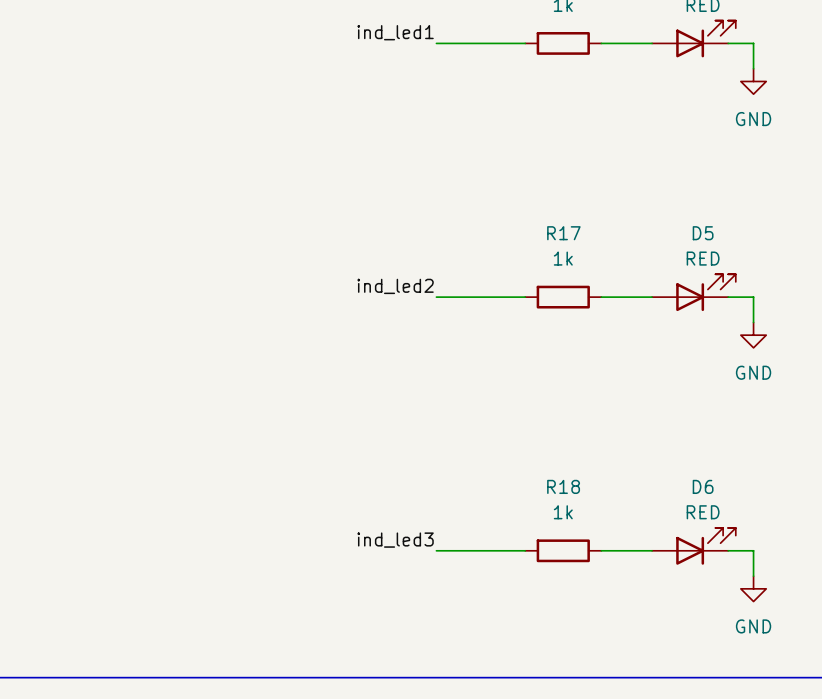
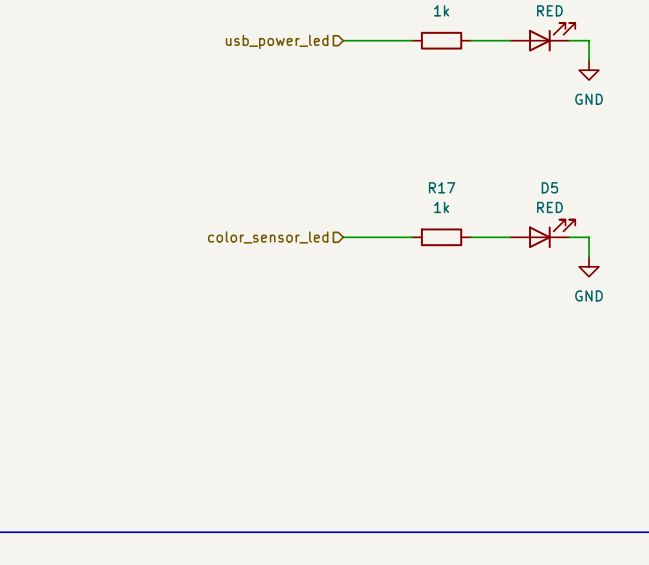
label: ind_led1 (395, 32) -> none
hierarchical label: none -> usb_power_led (277, 41)
label: ind_led2 (395, 286) -> none
hierarchical label: none -> color_sensor_led (268, 237)
label: ind_led3 (395, 540) -> none
D6: RED (693, 546) -> none
wire: (436, 550) (525, 550) -> none
R18: 1k (563, 550) -> none
wire: (601, 550) (652, 550) -> none
wire: (728, 550) (753, 550) (753, 576) -> none
power symbol: GND (753, 588) -> none

